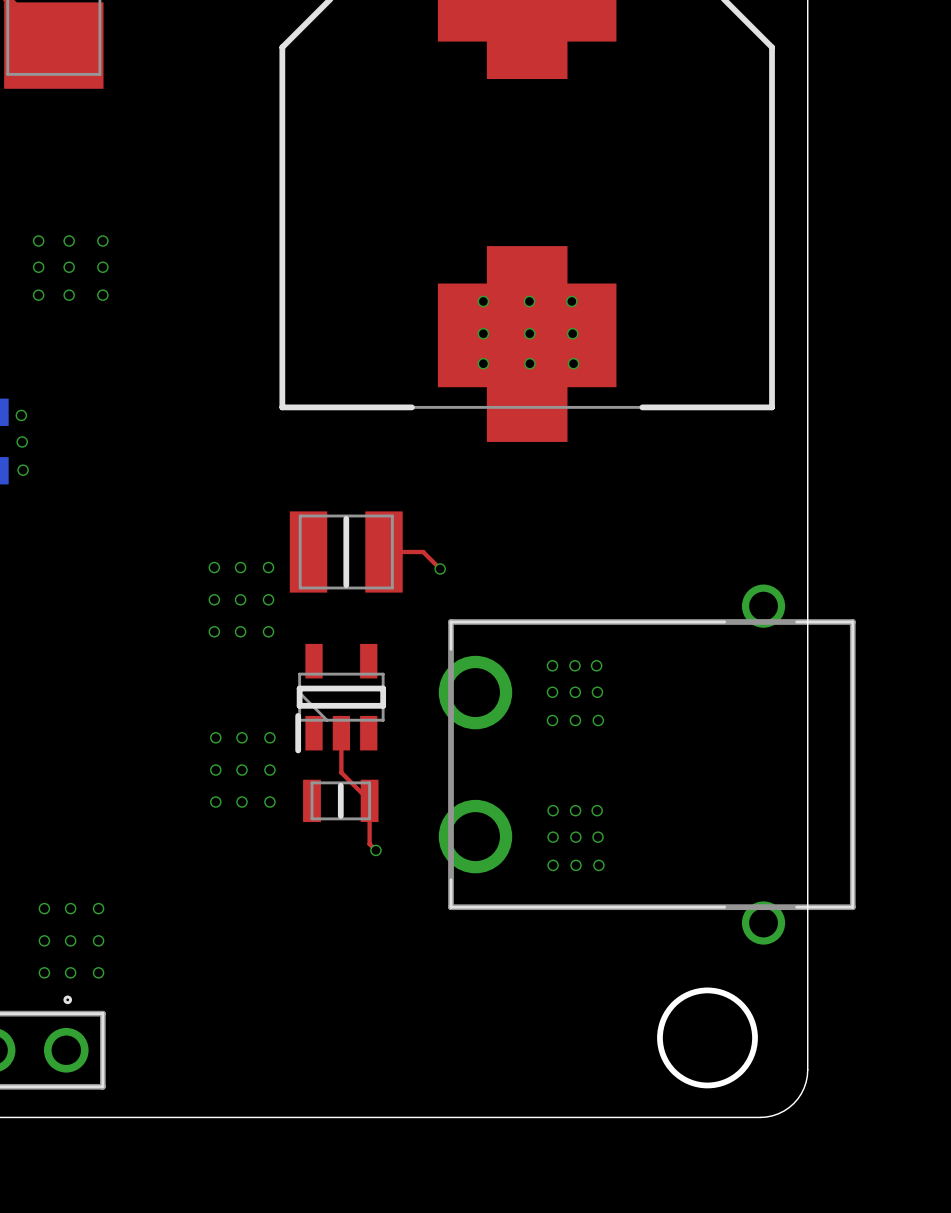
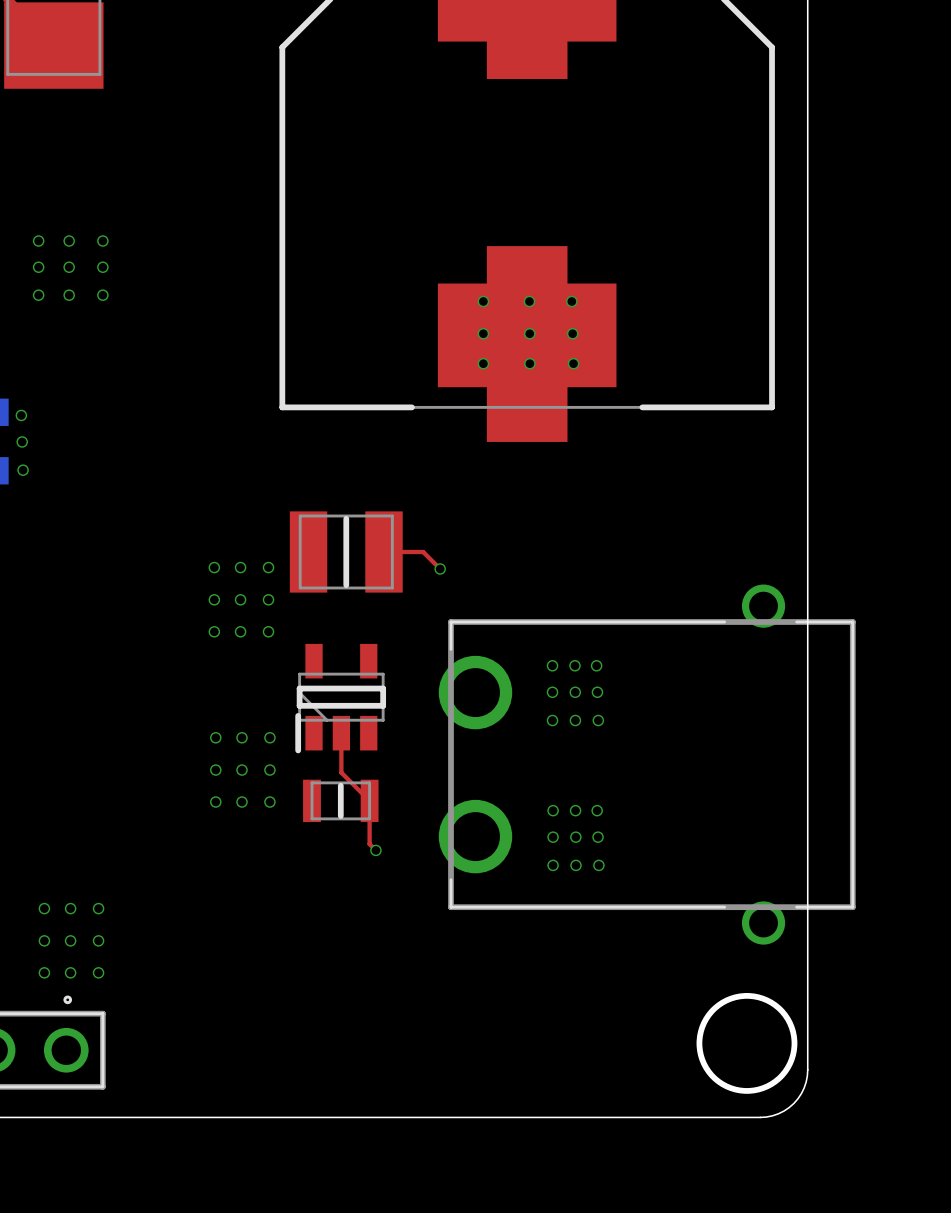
round board edge position: (707, 1037) -> (746, 1043)

